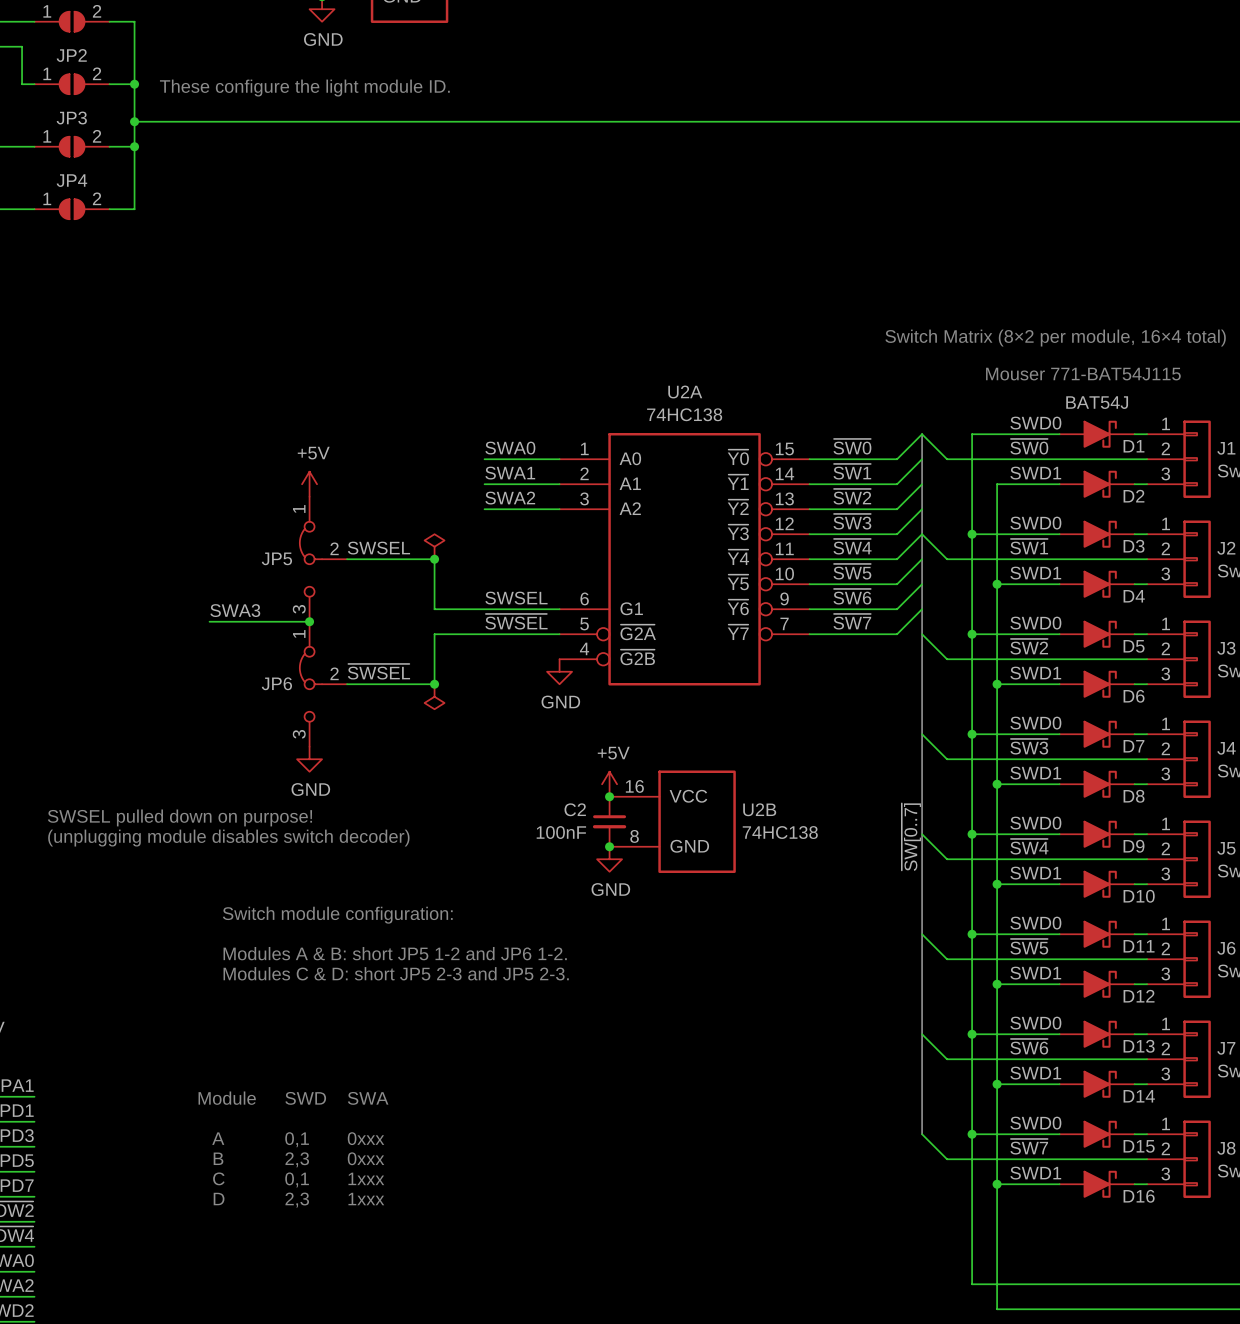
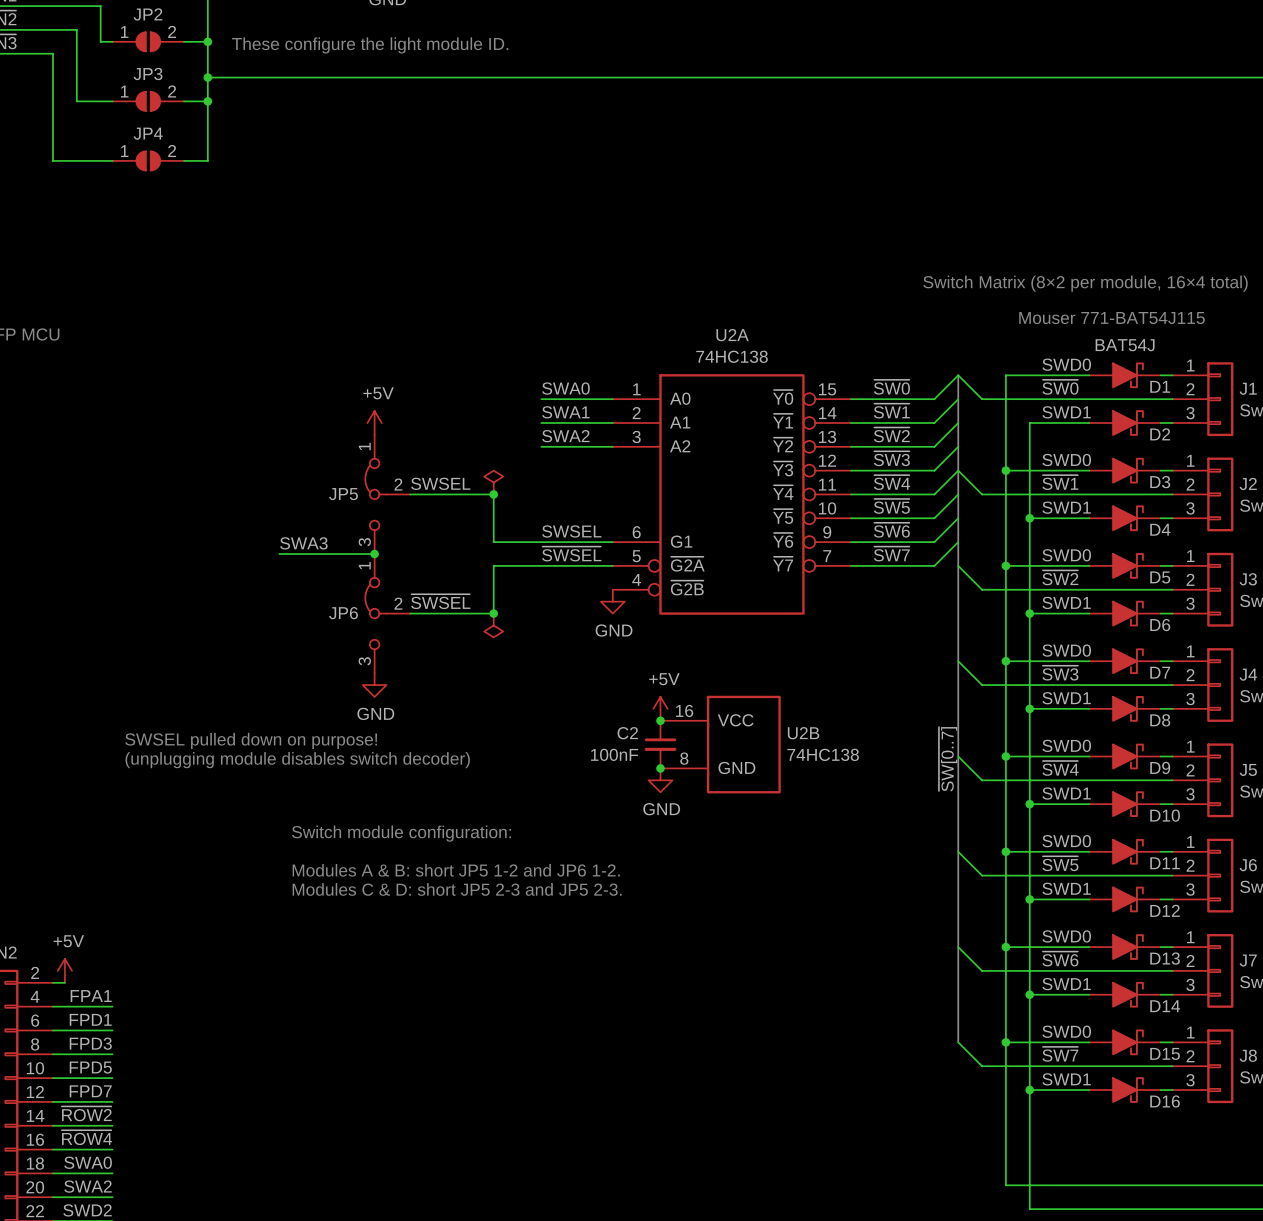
text: Module (227, 1098) -> none
text: SWD (305, 1098) -> none
text: SWA (368, 1098) -> none
text: A (218, 1138) -> none
text: 0xxx (365, 1138) -> none
text: 0,1 (297, 1139) -> none
text: B (218, 1158) -> none
text: 0xxx (365, 1158) -> none
text: 2,3 (297, 1159) -> none
text: C (218, 1178) -> none
text: 1xxx (366, 1178) -> none
text: 0,1 (297, 1179) -> none
text: D (219, 1199) -> none
text: 1xxx (366, 1199) -> none
text: 2,3 (297, 1200) -> none

